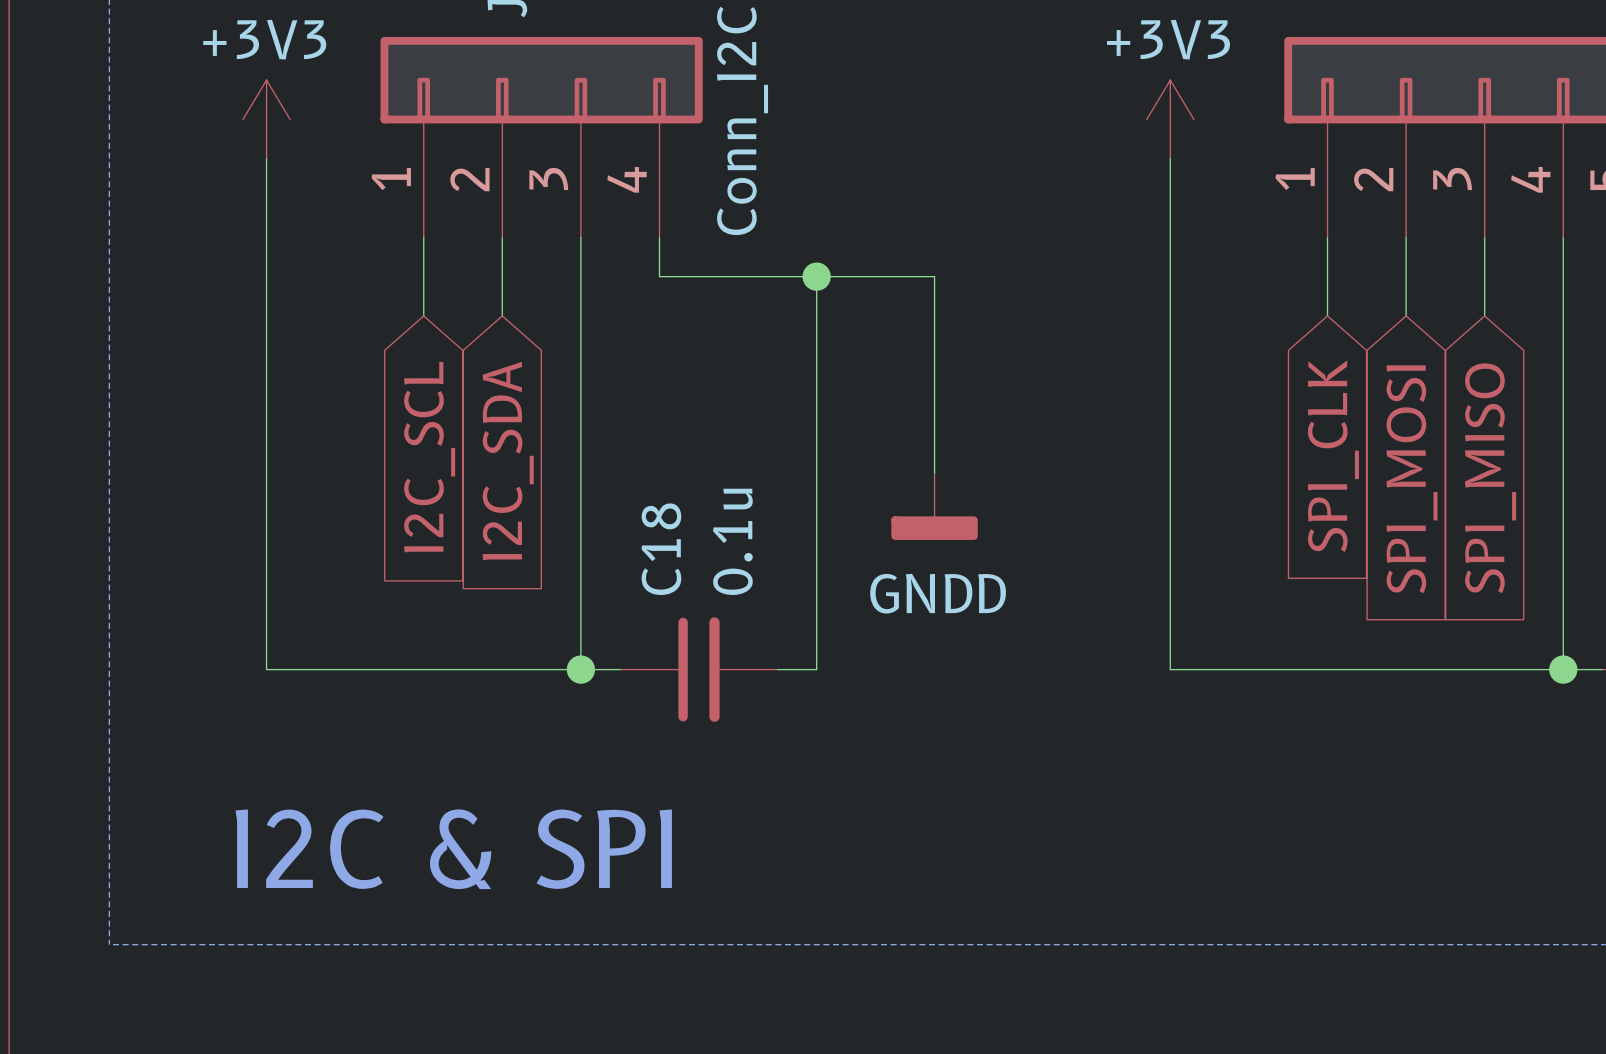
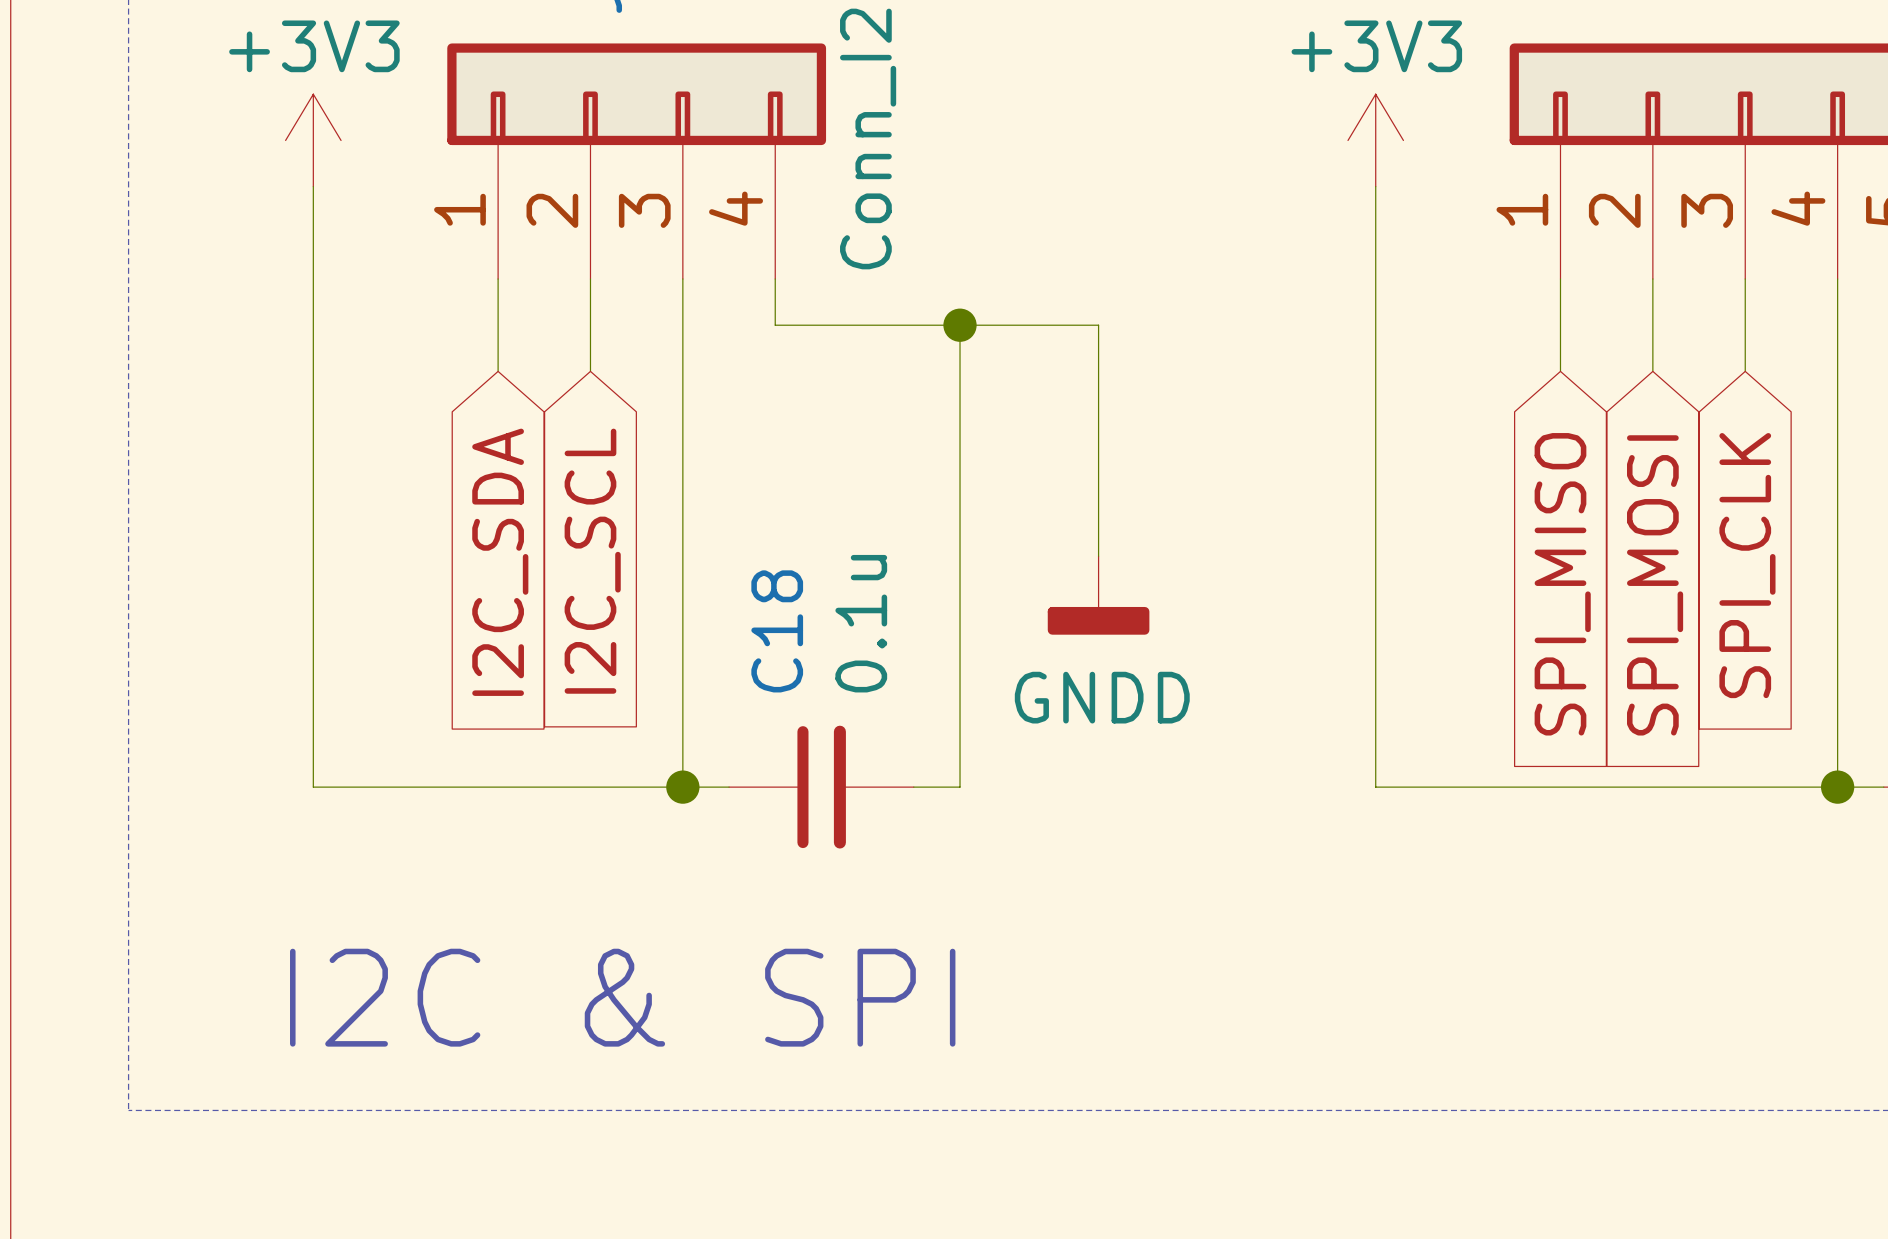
global label: SPI_CLK (1333, 456) -> SPI_MISO (1562, 584)
global label: I2C_SCL (429, 457) -> I2C_SDA (500, 562)
global label: I2C_SDA (508, 461) -> I2C_SCL (592, 561)
global label: SPI_MISO (1490, 478) -> SPI_CLK (1747, 565)

